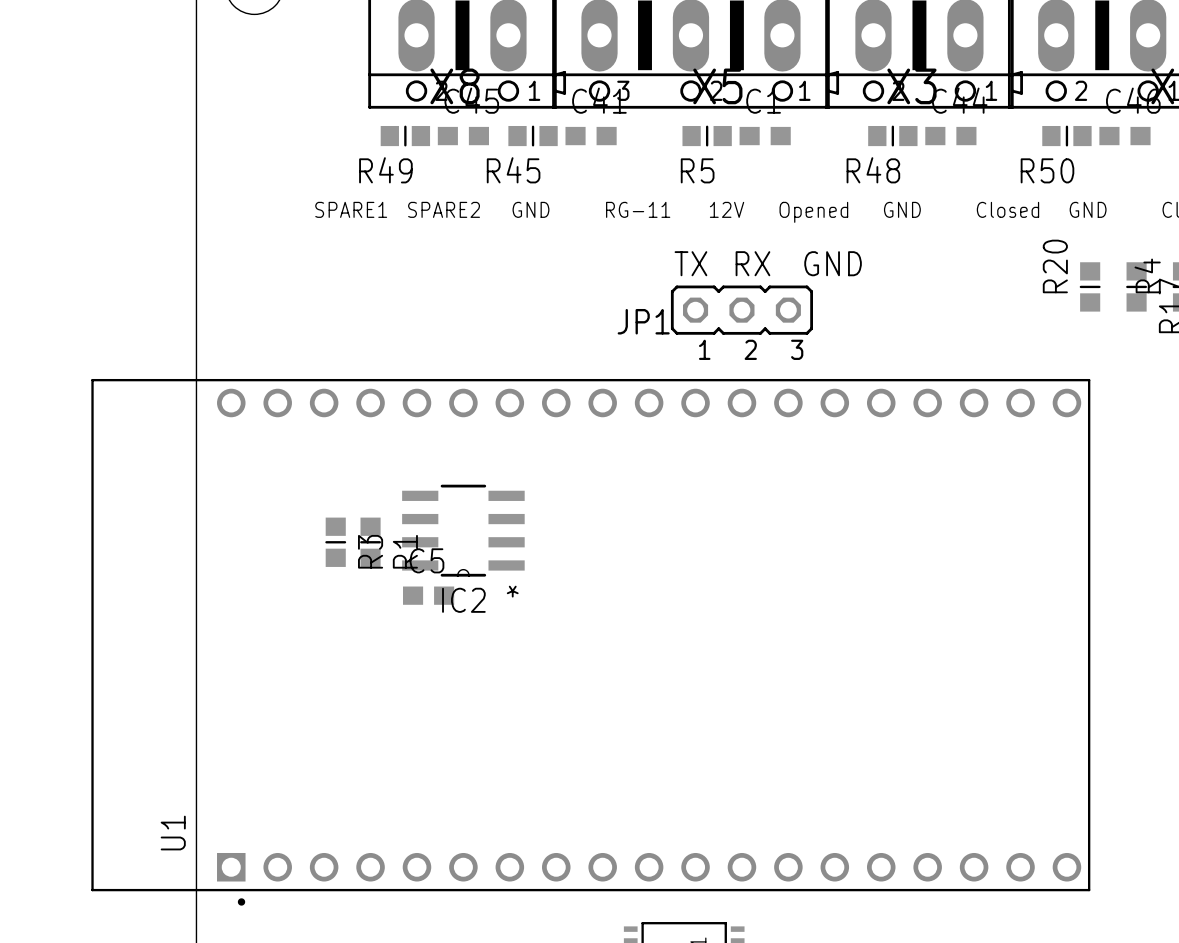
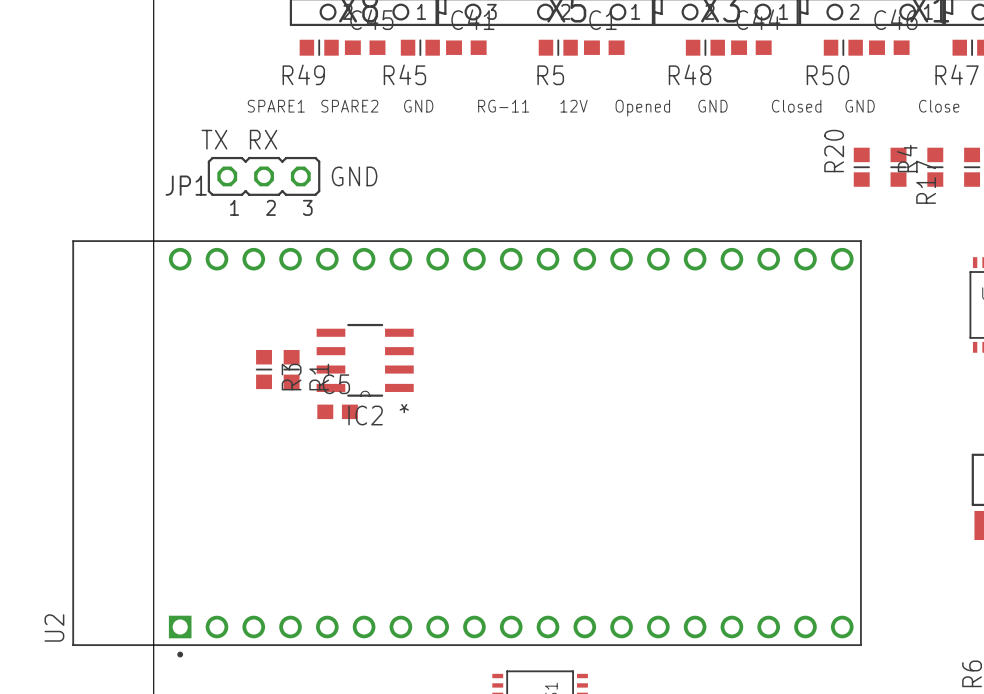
text position: TX (690, 263) -> TX (214, 139)
text position: RX (752, 263) -> RX (263, 139)
text position: GND (833, 263) -> GND (354, 176)
JP1 position: (741, 310) -> (264, 176)
U1: (590, 642) -> none
U2: none -> (467, 448)

